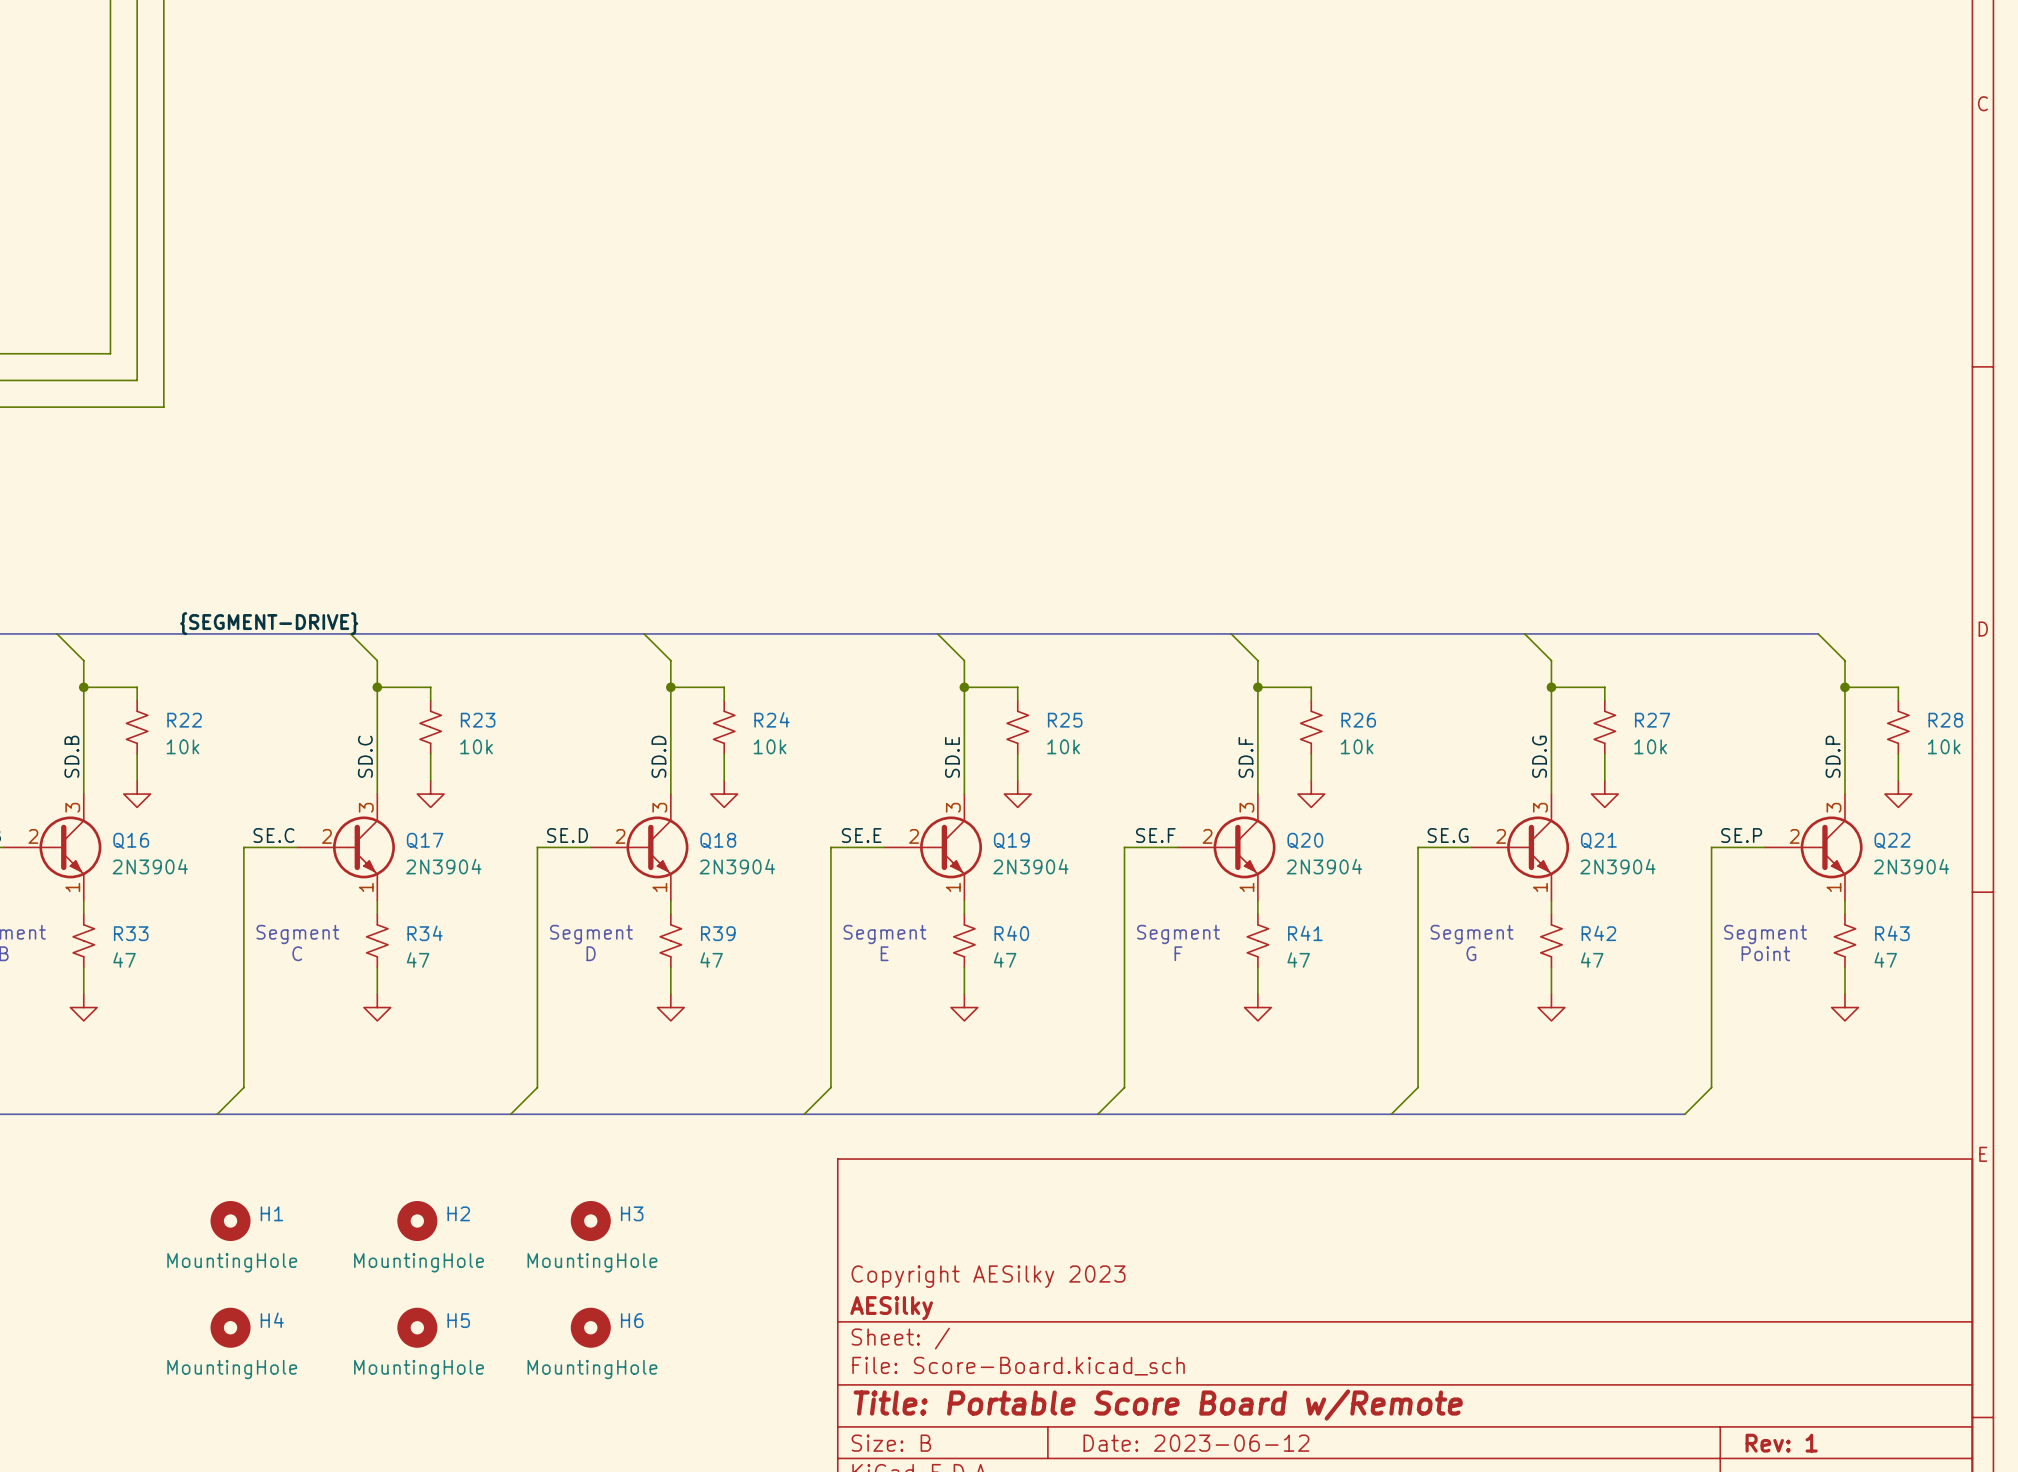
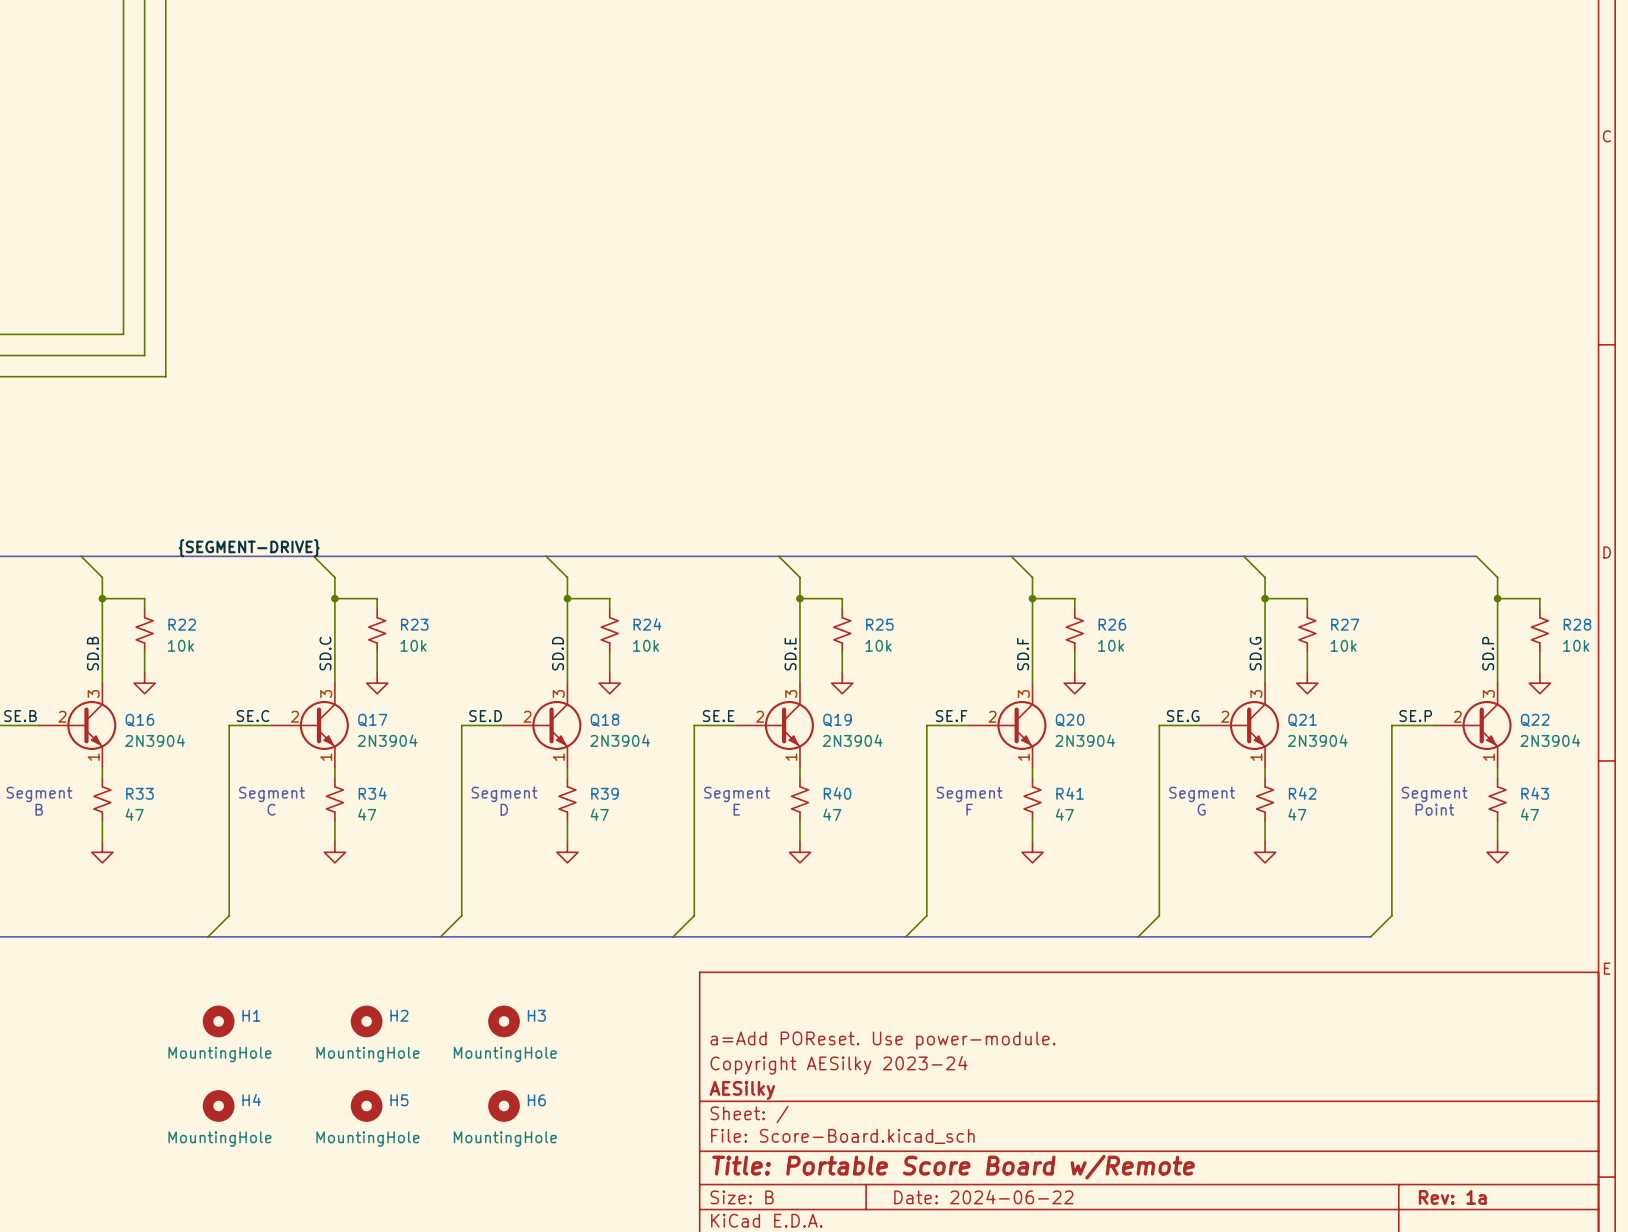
title block: none -> a=Add POReset. Use power-module. (883, 1040)
title block: Copyright AESilky 2023 (988, 1276) -> Copyright AESilky 2023-24 (839, 1065)
title block: Date: 2023-06-12 (1196, 1443) -> Date: 2024-06-22 (983, 1197)
title block: Rev: 1 (1781, 1443) -> Rev: 1a (1452, 1197)

